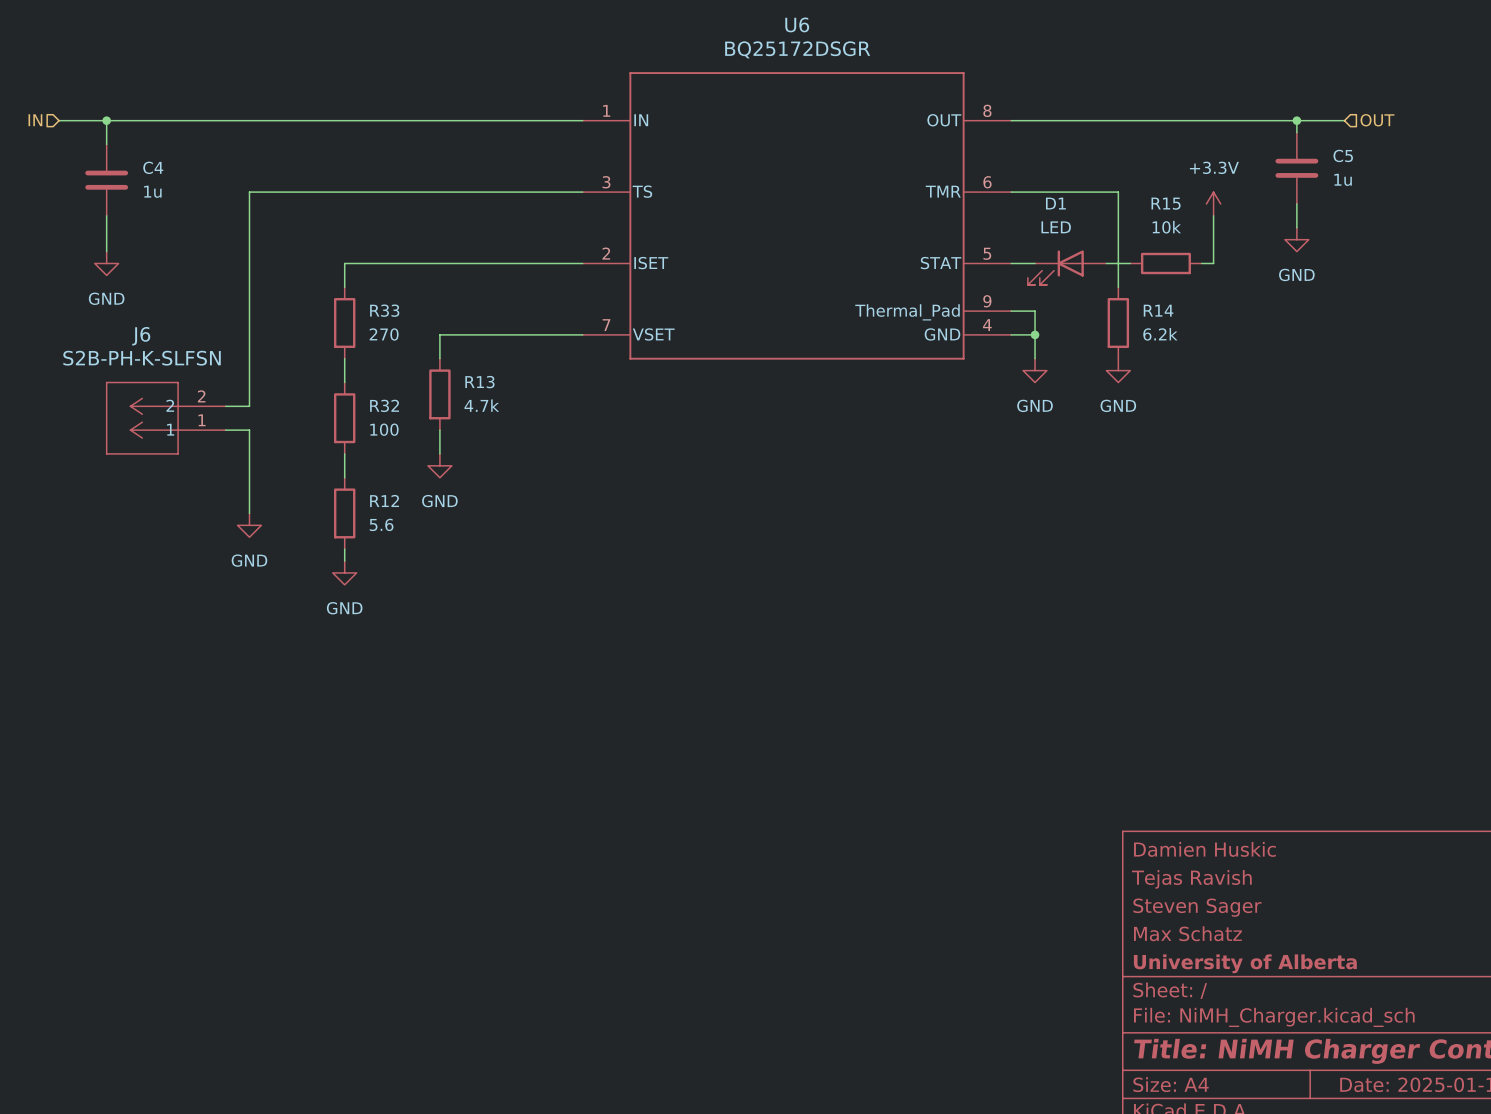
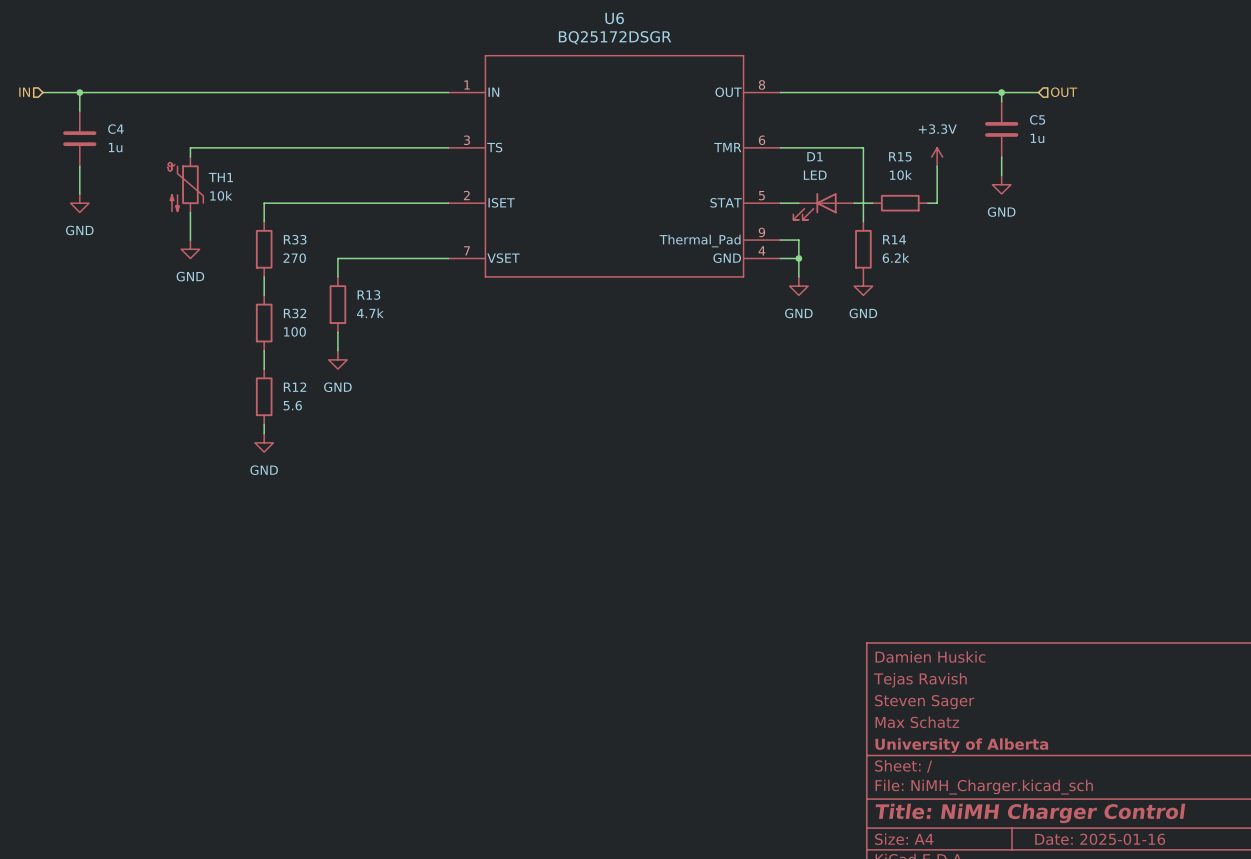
wire: (249, 203) (249, 275) -> none
TH1: none -> 10k (185, 184)
wire: (249, 311) (249, 406) (225, 406) -> none
J6: S2B-PH-K-SLFSN (165, 418) -> none
wire: (225, 430) (249, 430) (249, 513) -> none
power symbol position: GND (249, 525) -> GND (190, 249)

